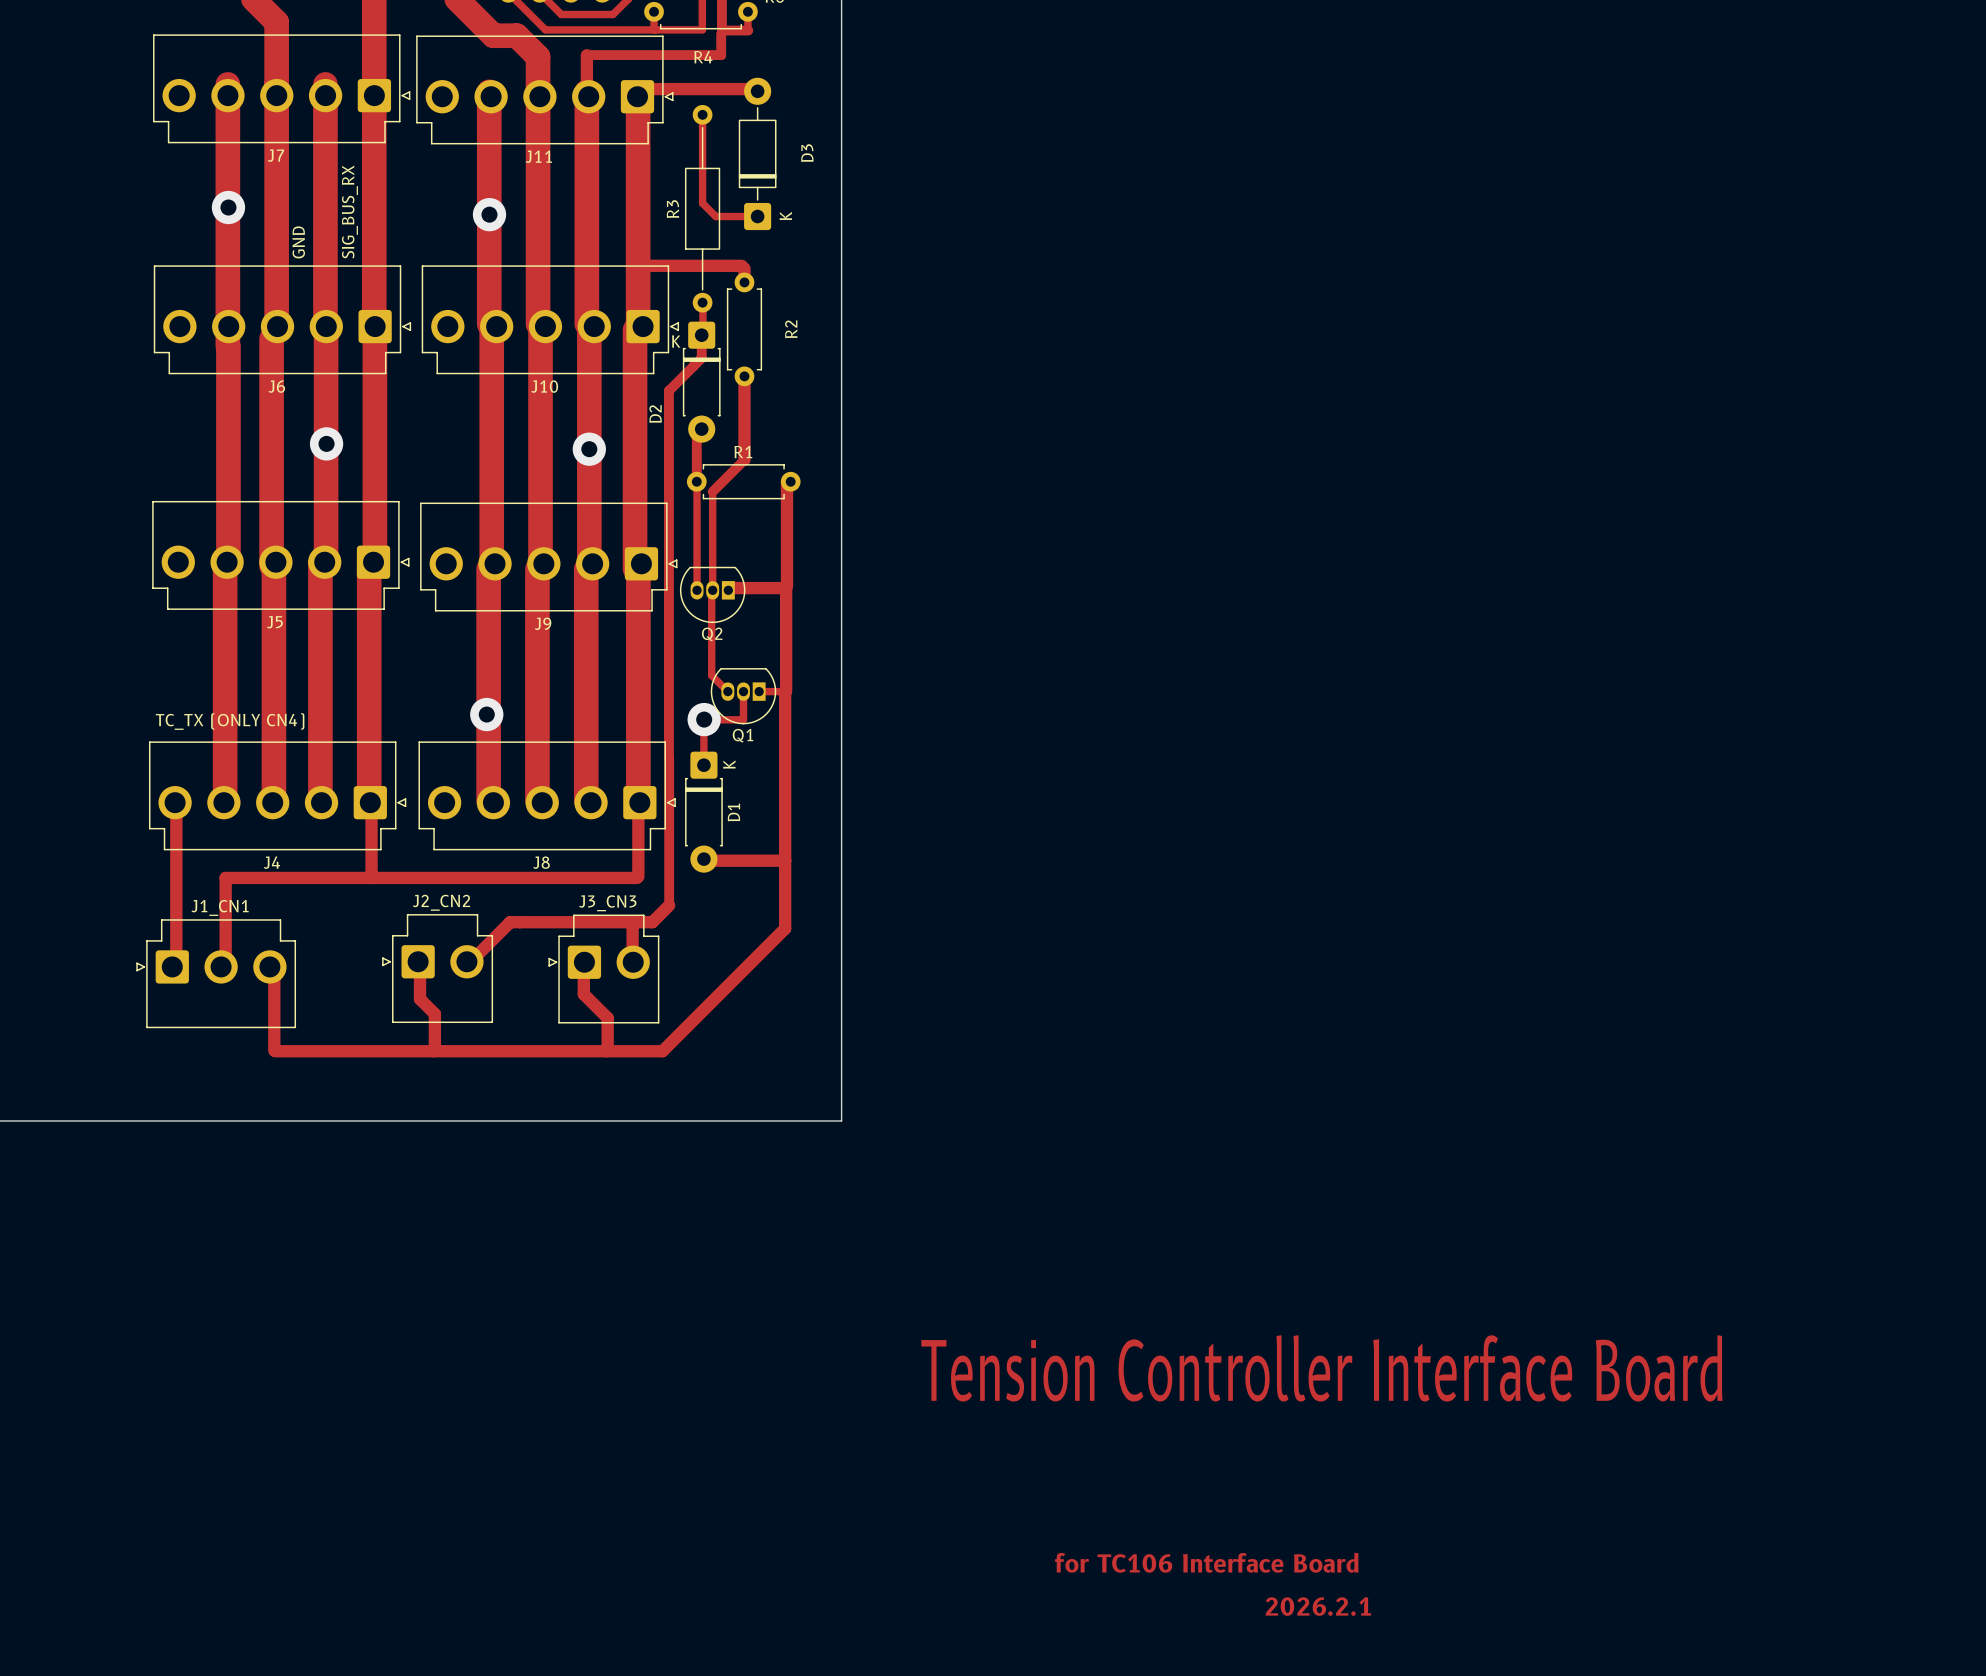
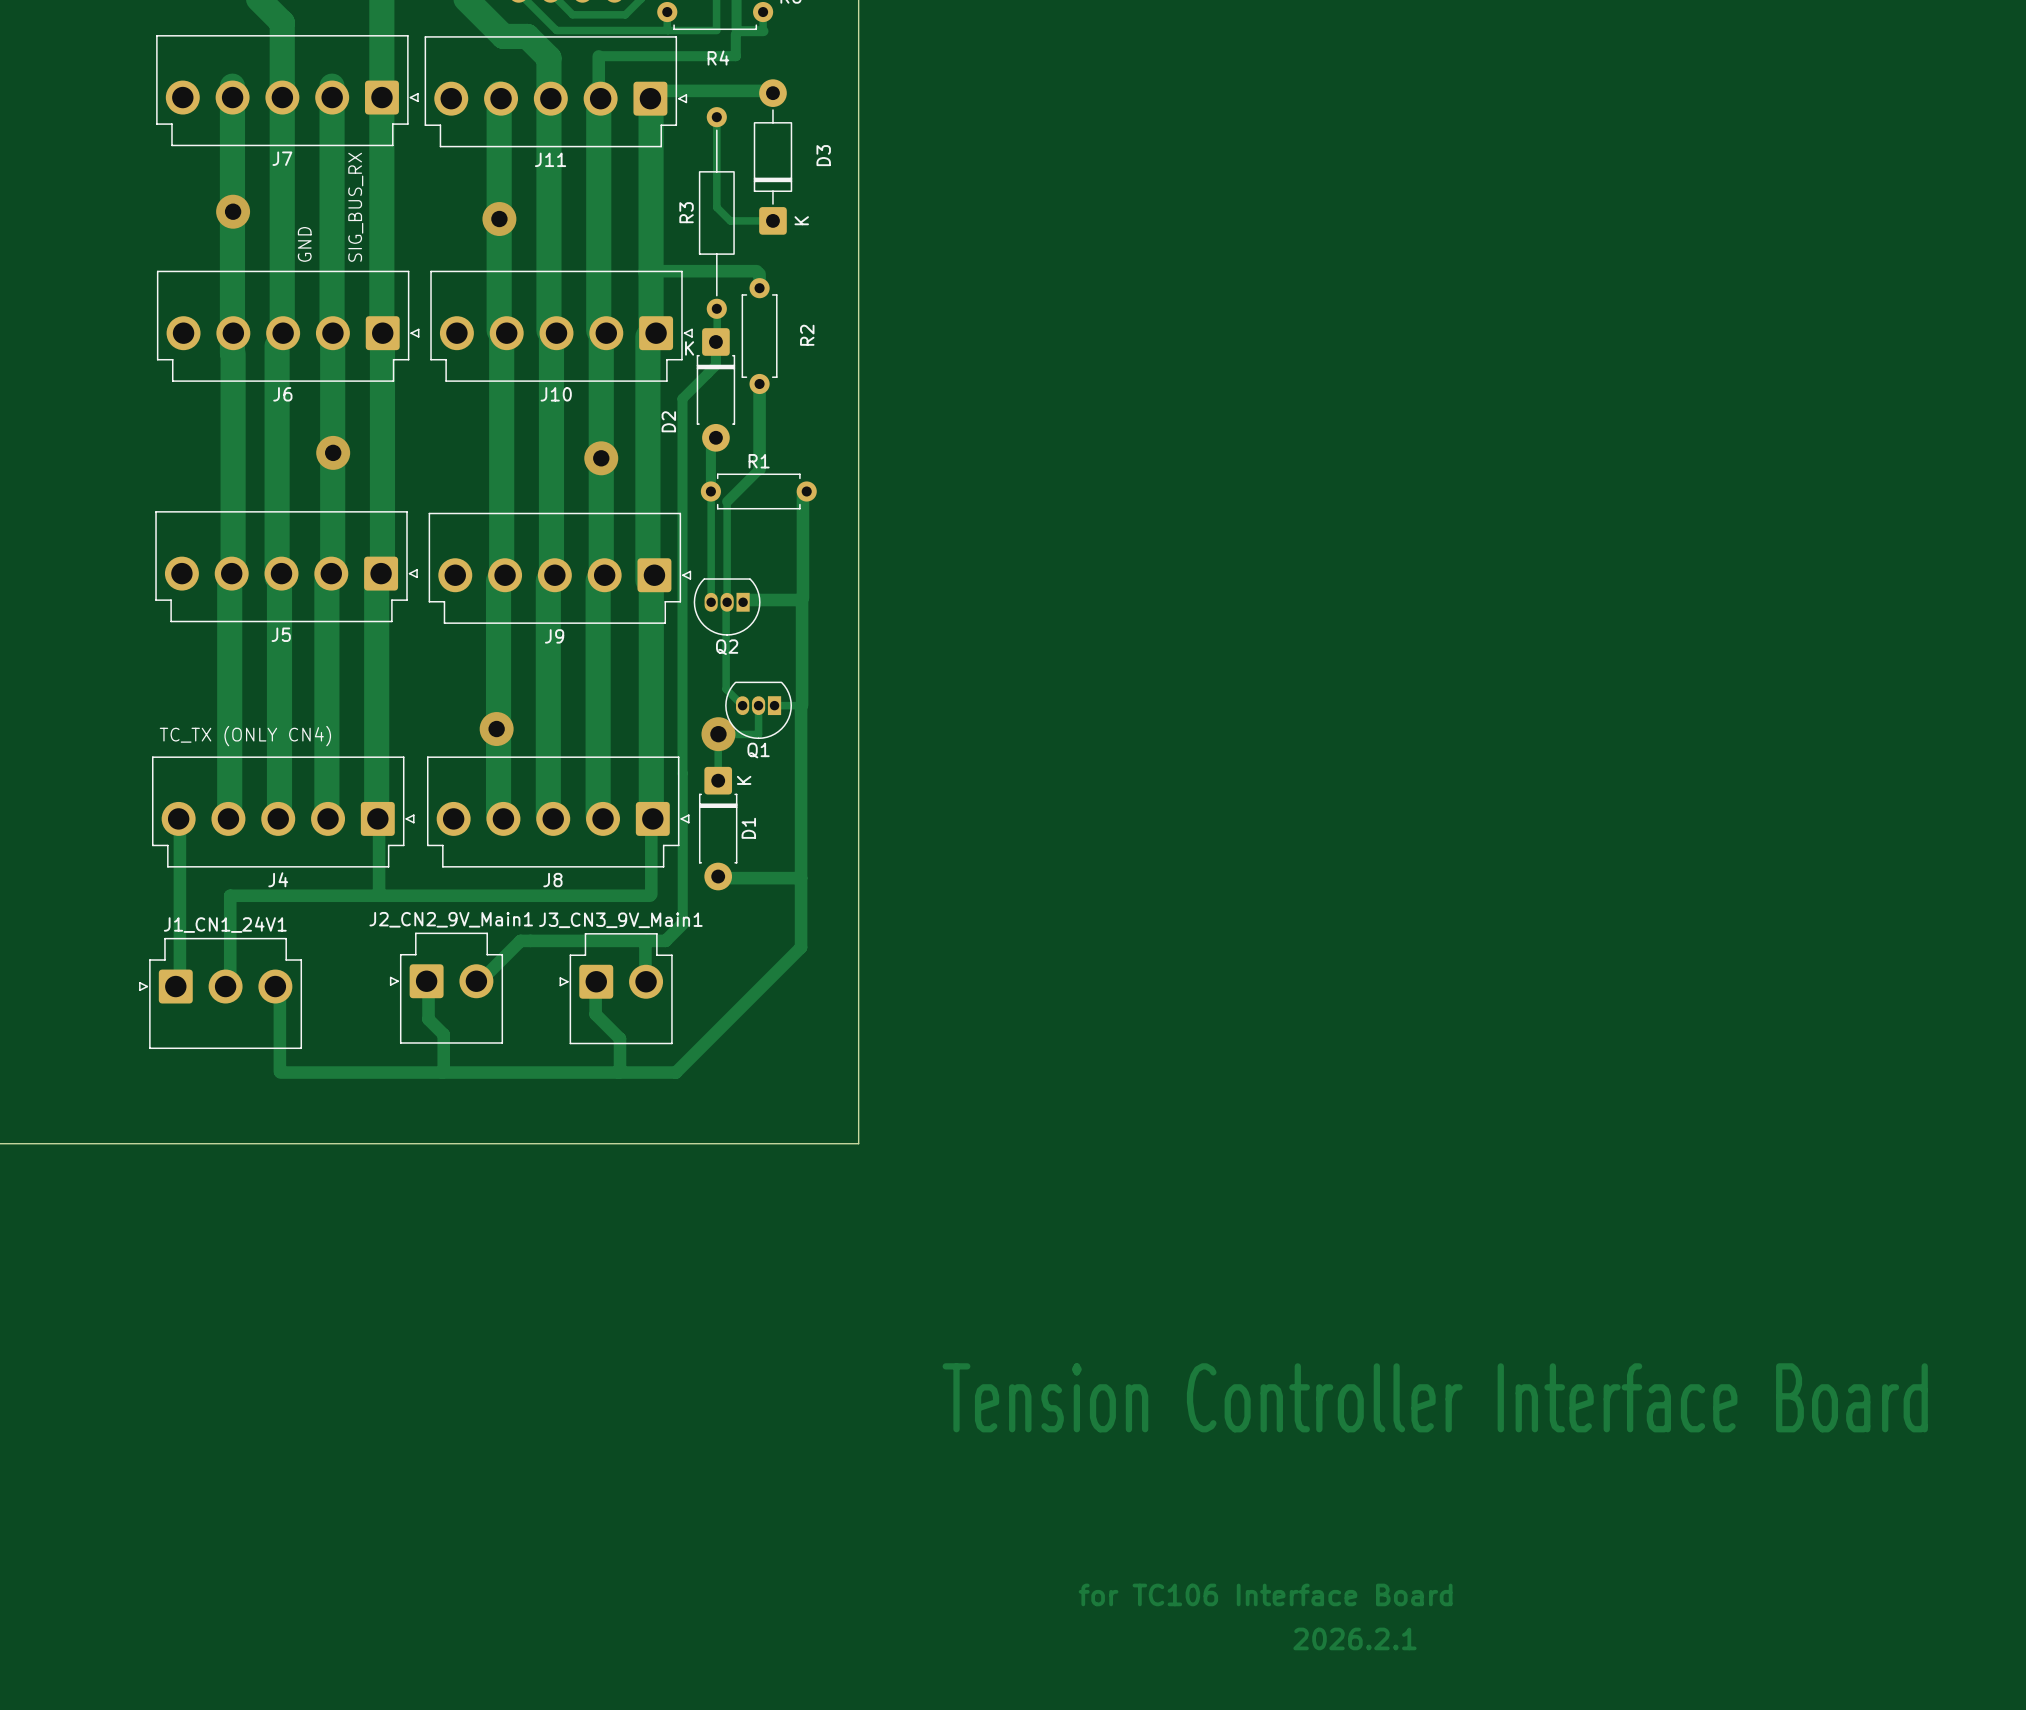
J2_CN2 name: J2_CN2 (441, 902) -> J2_CN2_9V_Main1 (451, 919)
J3_CN3 name: J3_CN3 (607, 903) -> J3_CN3_9V_Main1 (620, 920)
J1_CN1 name: J1_CN1 (220, 907) -> J1_CN1_24V1 (225, 924)

